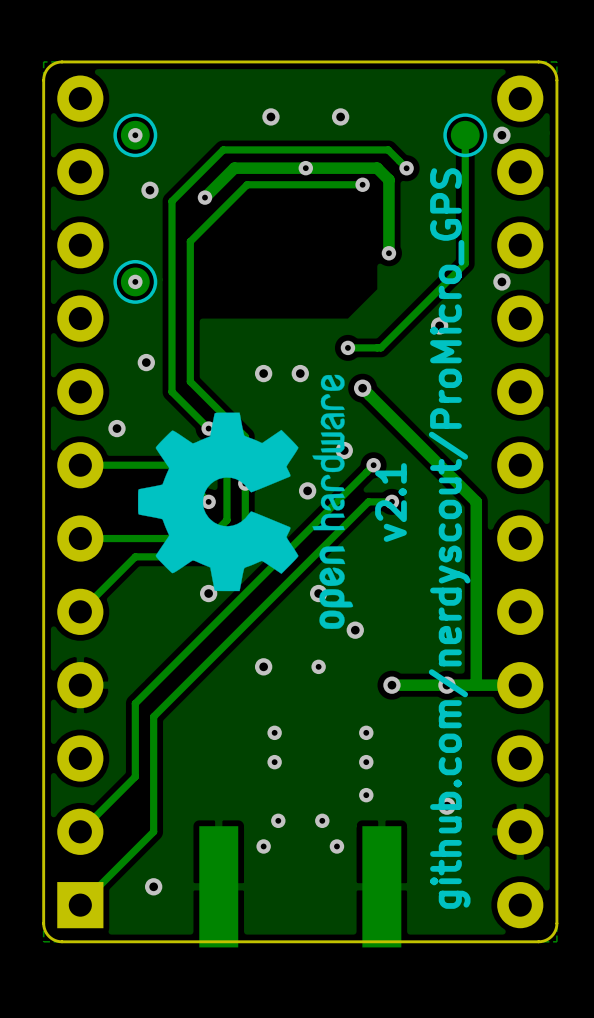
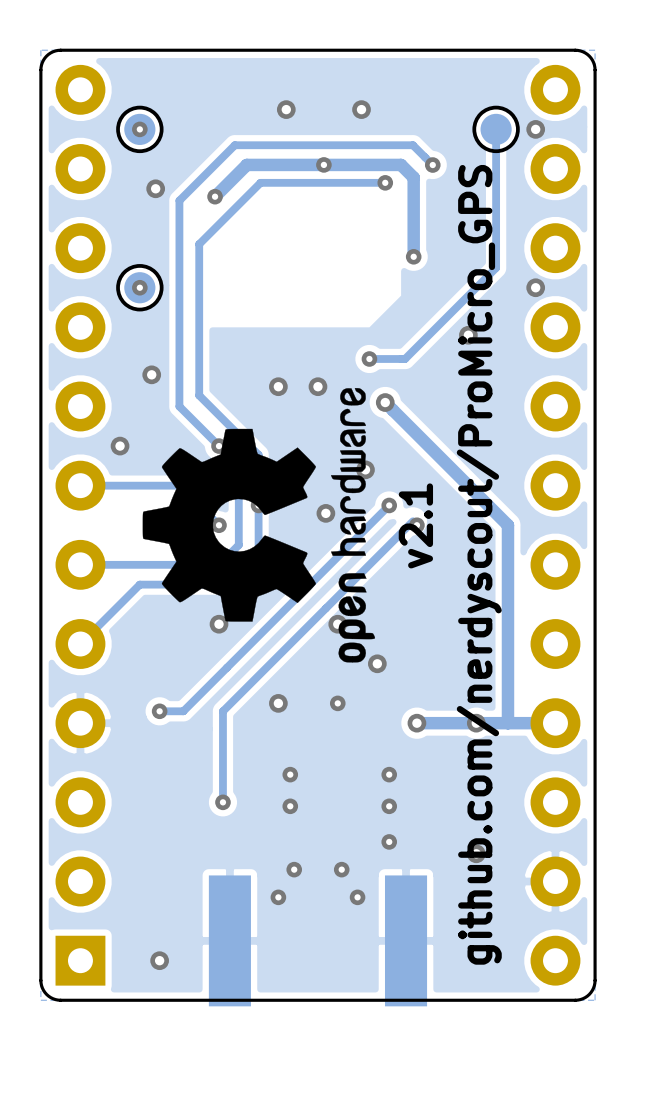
track: (373, 465) (135, 703) (135, 776) (80, 831) -> none
via position: (373, 465) -> (389, 505)
track: none -> (389, 505) (183, 711) (159, 711)
track: none -> (412, 521) (222, 711) (222, 802)
track: (391, 501) (368, 501) (153, 716) (153, 831) (80, 905) -> none
via: none -> (159, 711)
via: none -> (222, 802)
via position: (153, 886) -> (159, 960)

